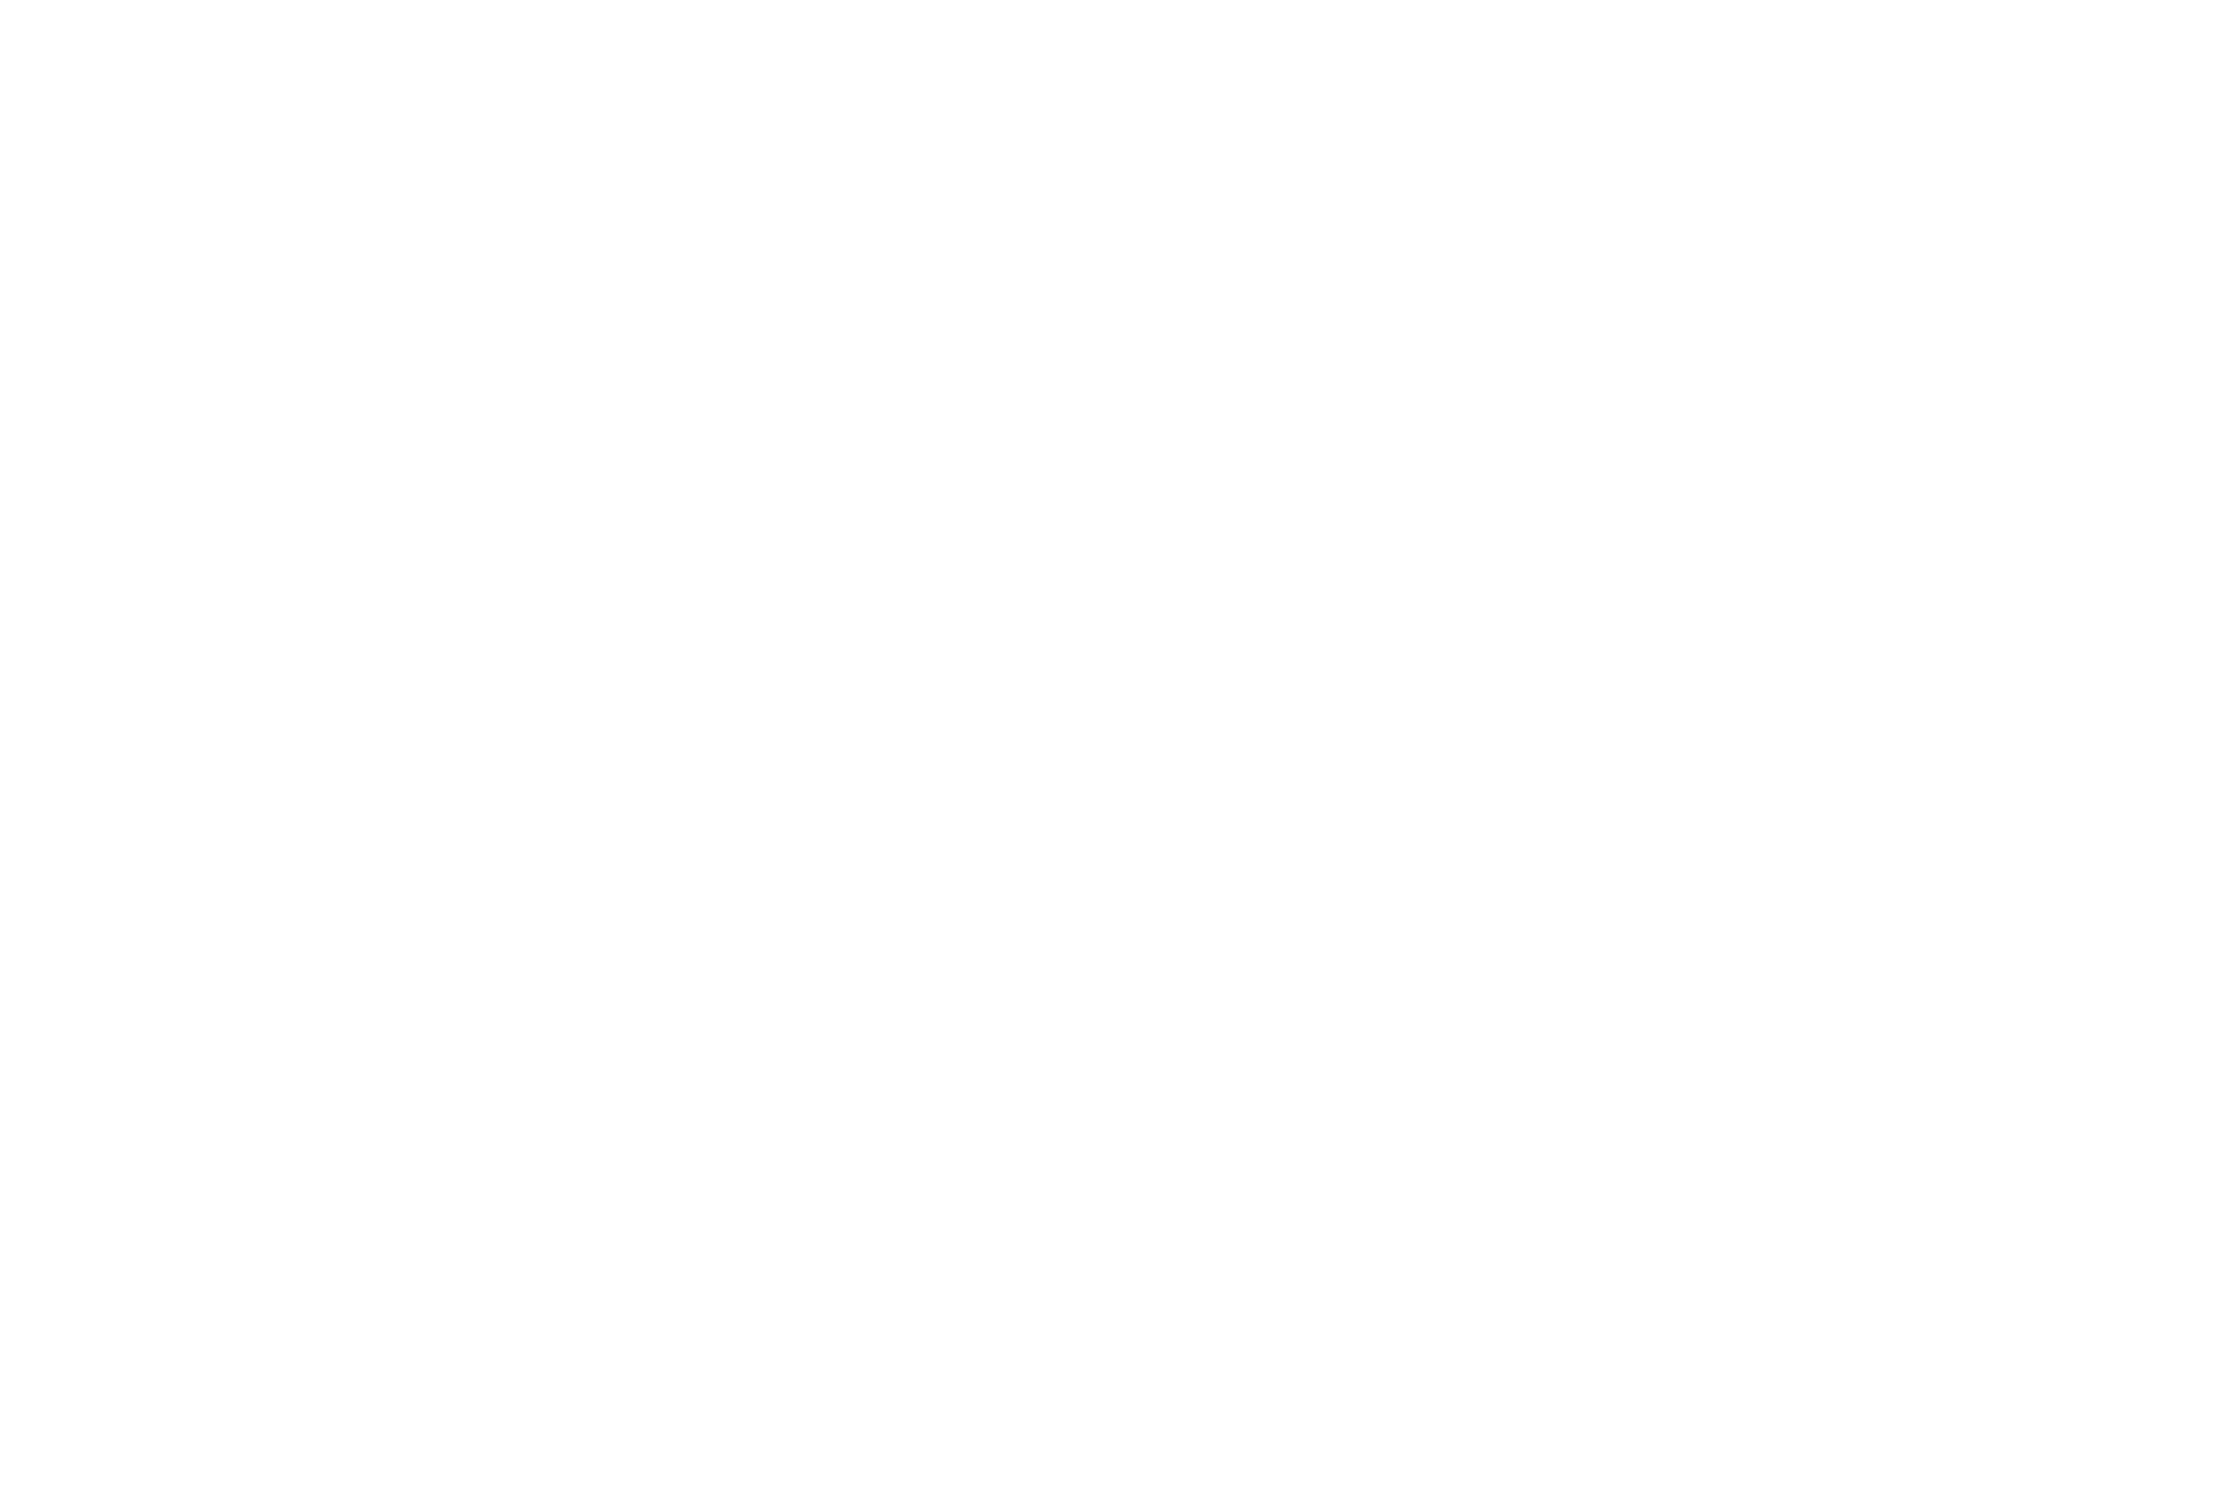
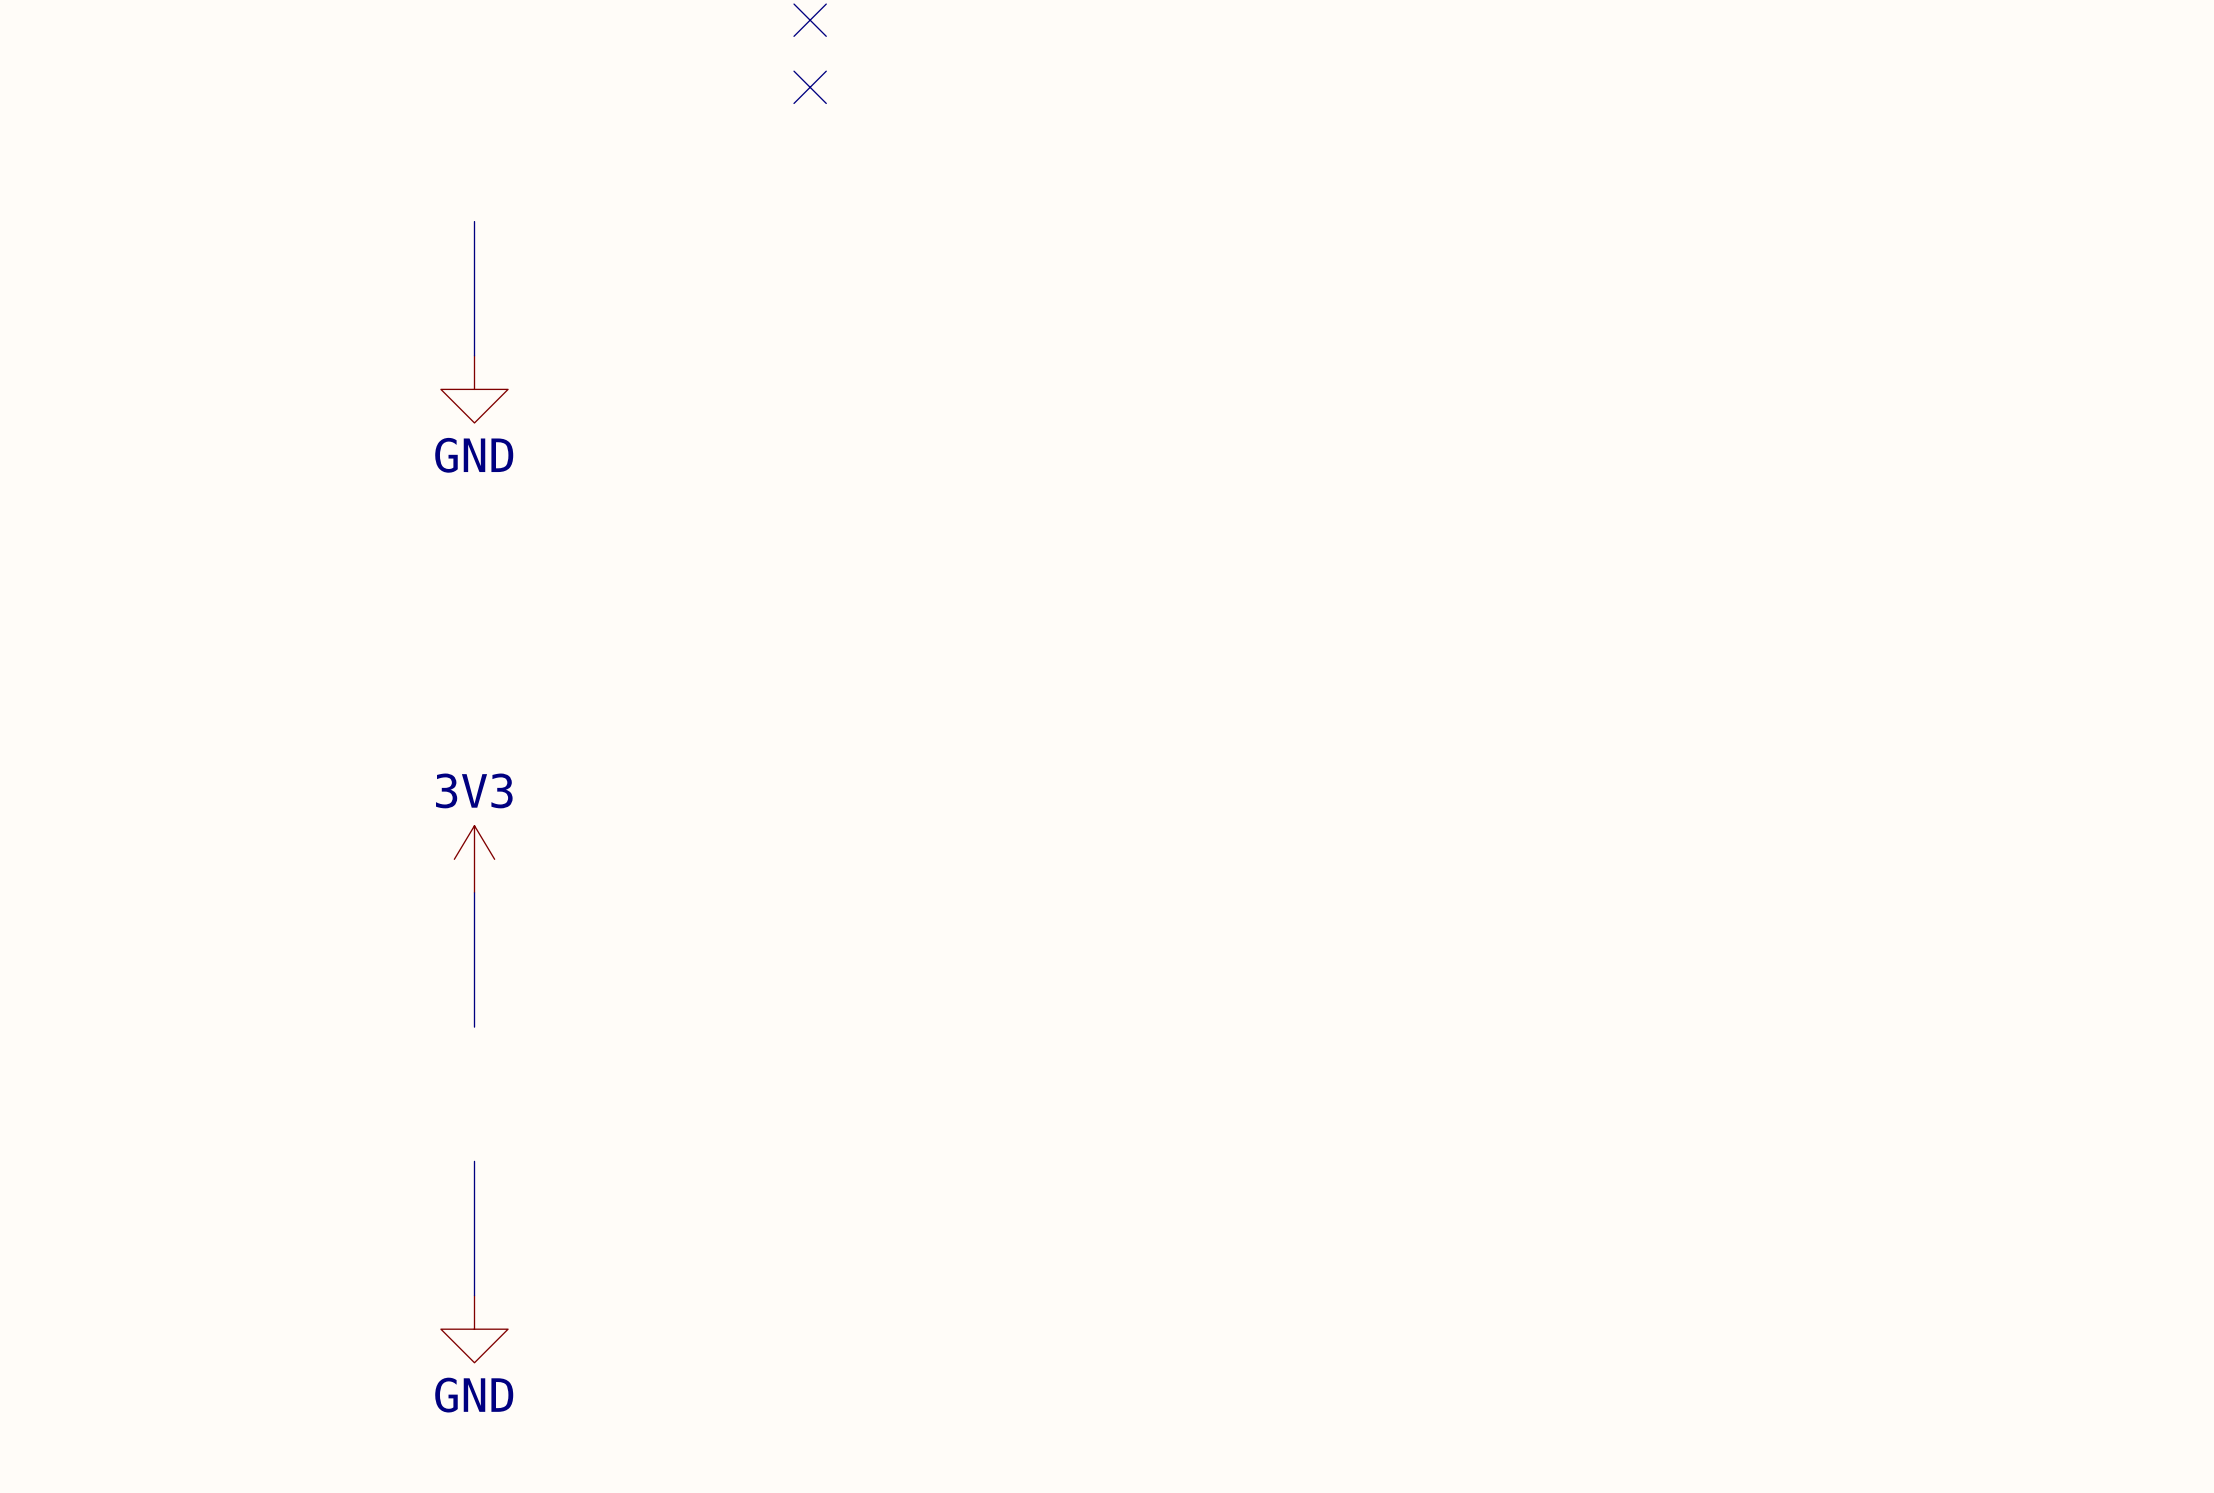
no-connect mark: none -> (810, 20)
no-connect mark: none -> (810, 87)
wire: none -> (474, 221) (474, 355)
power symbol: none -> GND (474, 389)
power symbol: none -> 3V3 (474, 859)
wire: none -> (474, 892) (474, 1027)
wire: none -> (474, 1161) (474, 1295)
power symbol: none -> GND (474, 1329)

